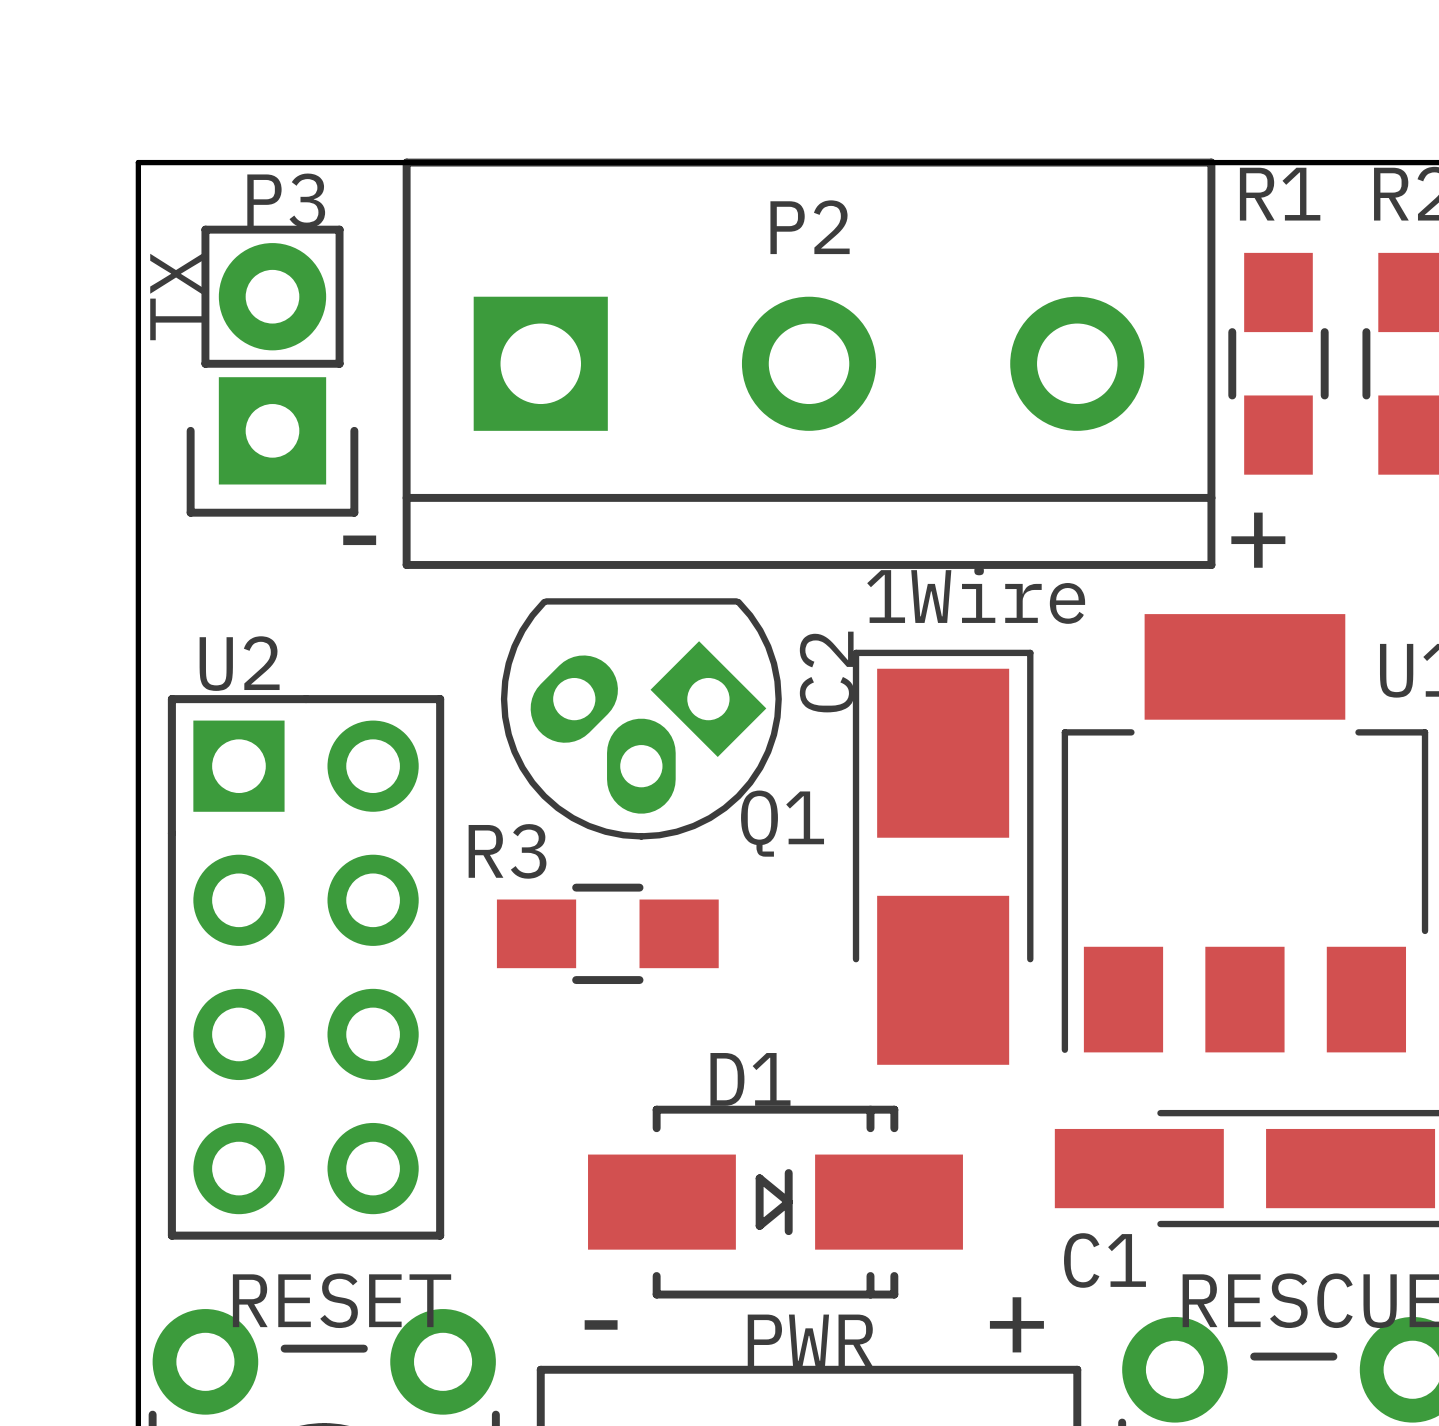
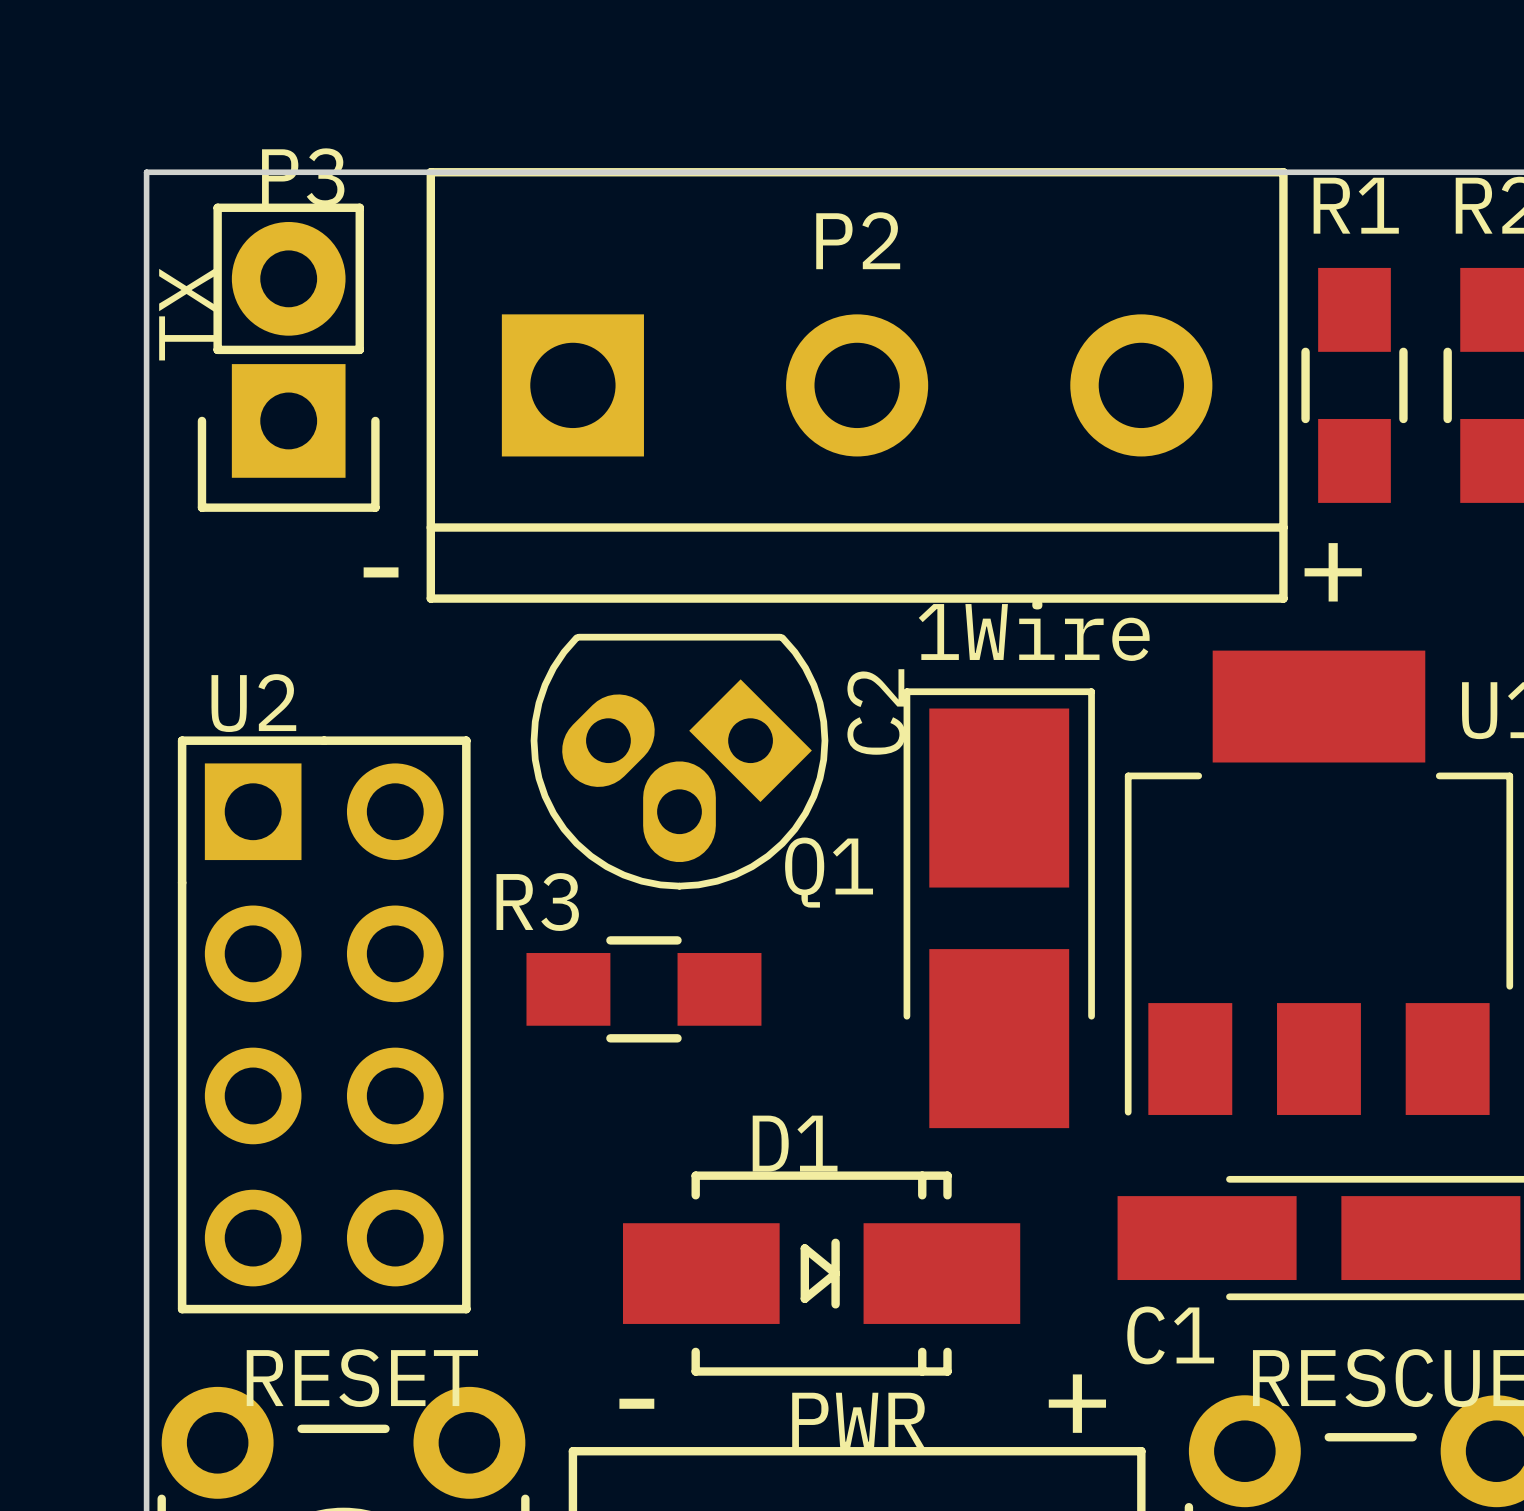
P3 position: (272, 371) -> (288, 357)

